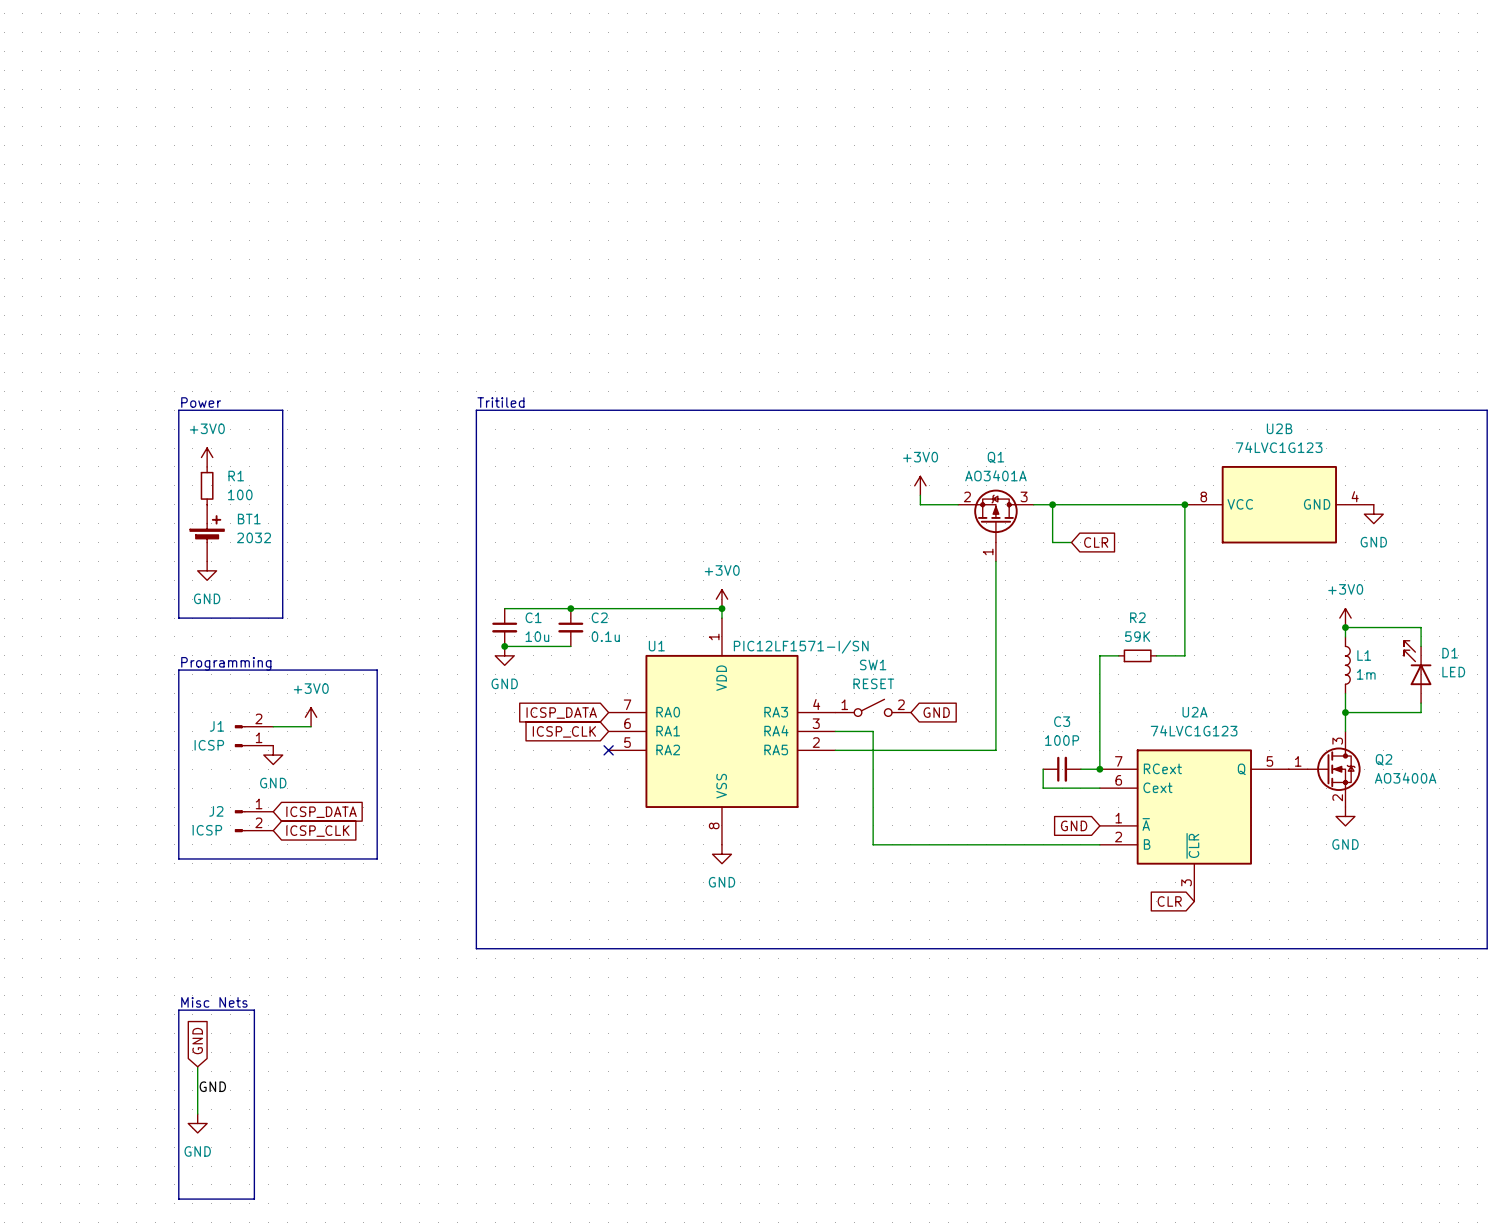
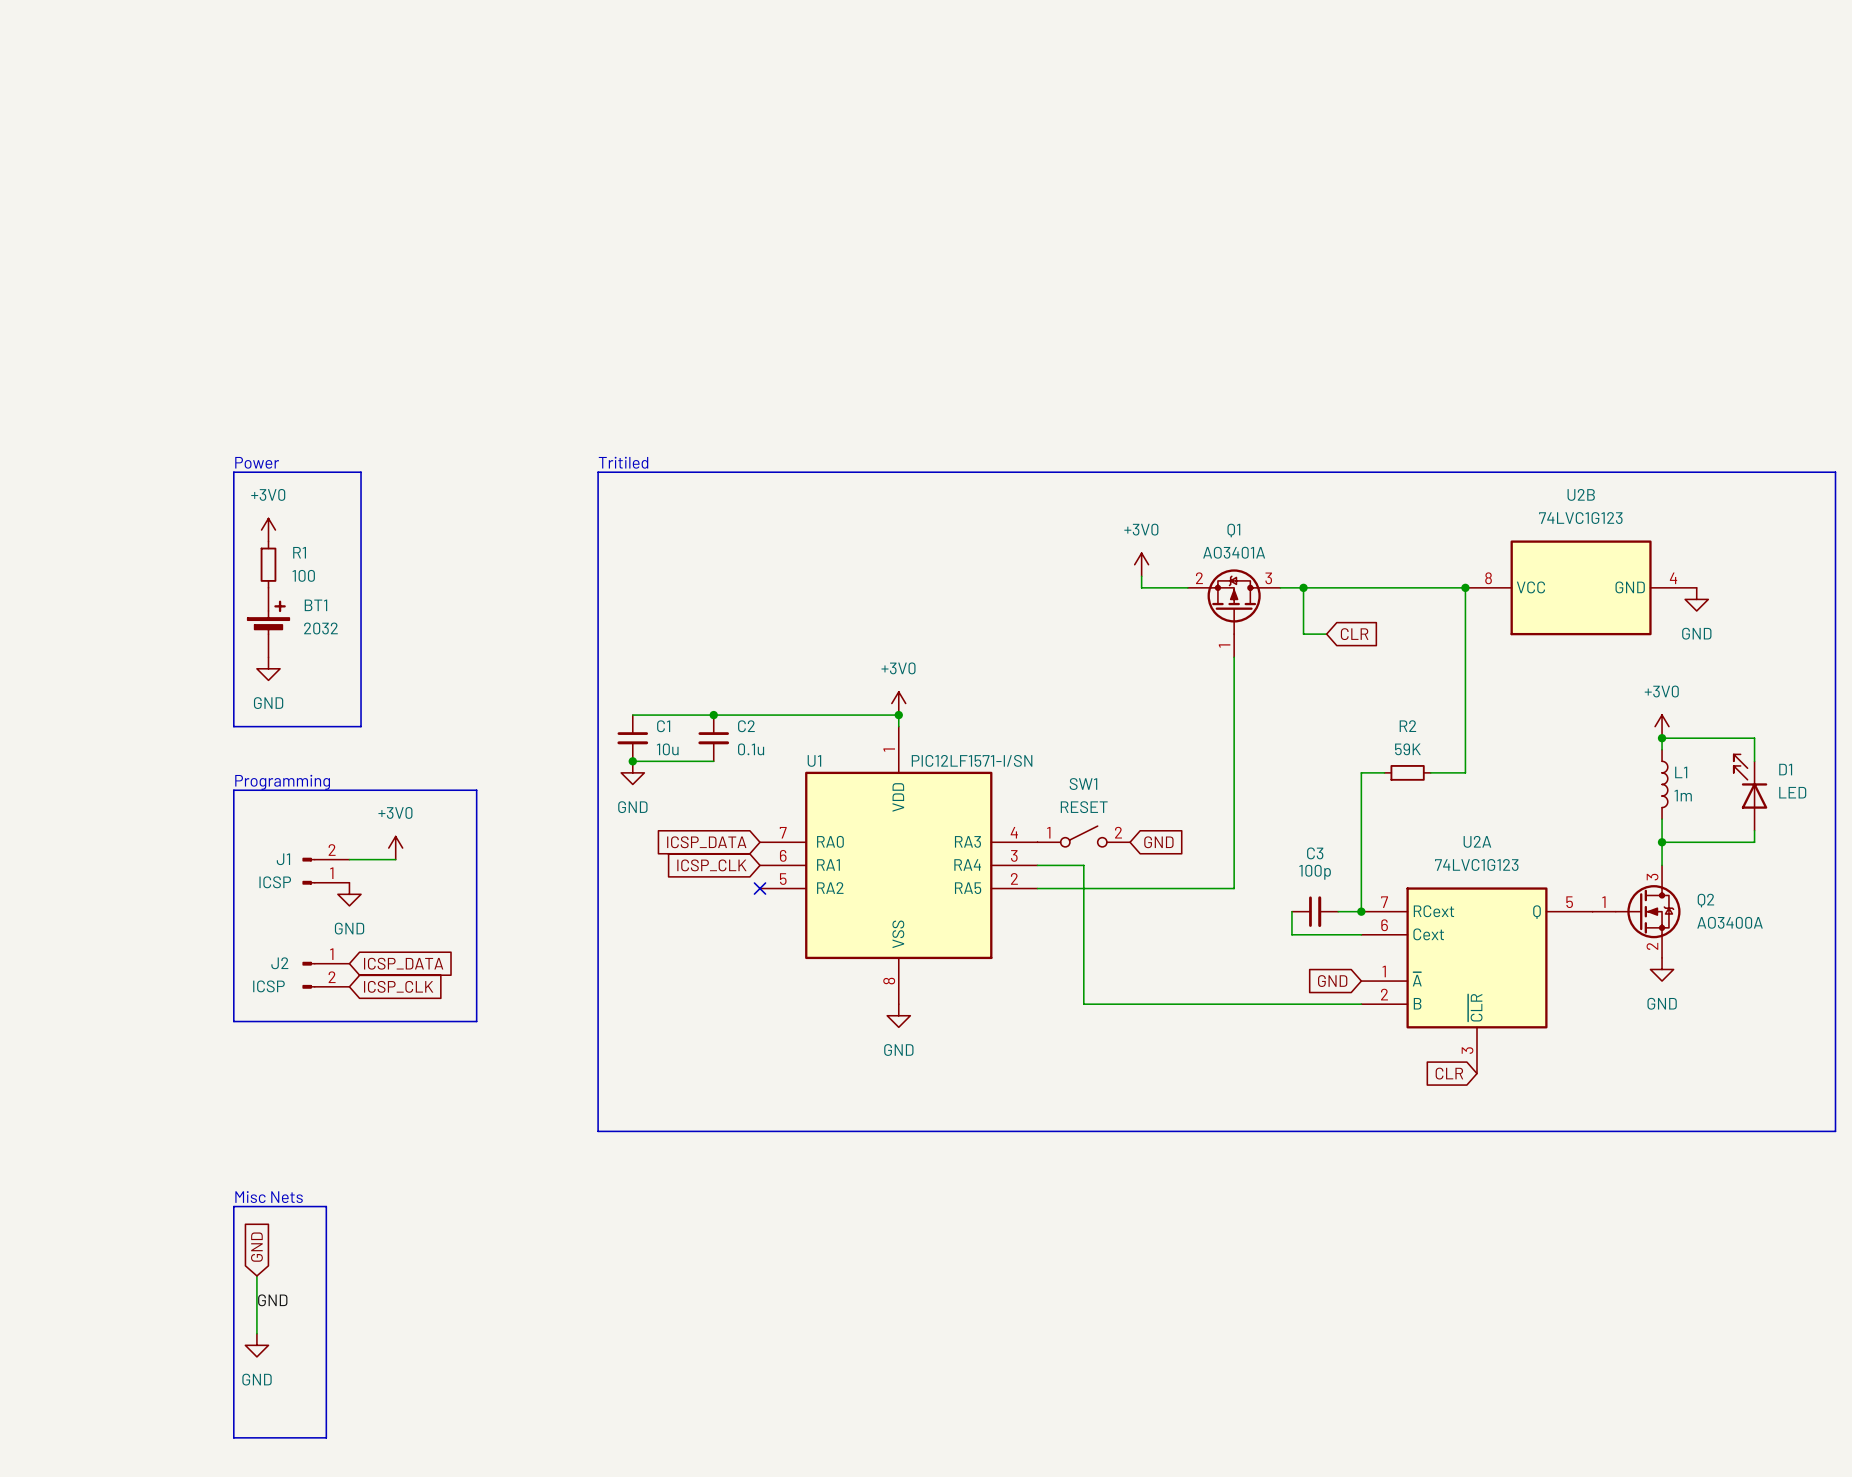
C3 value: 100P (1062, 740) -> 100p (1315, 872)

